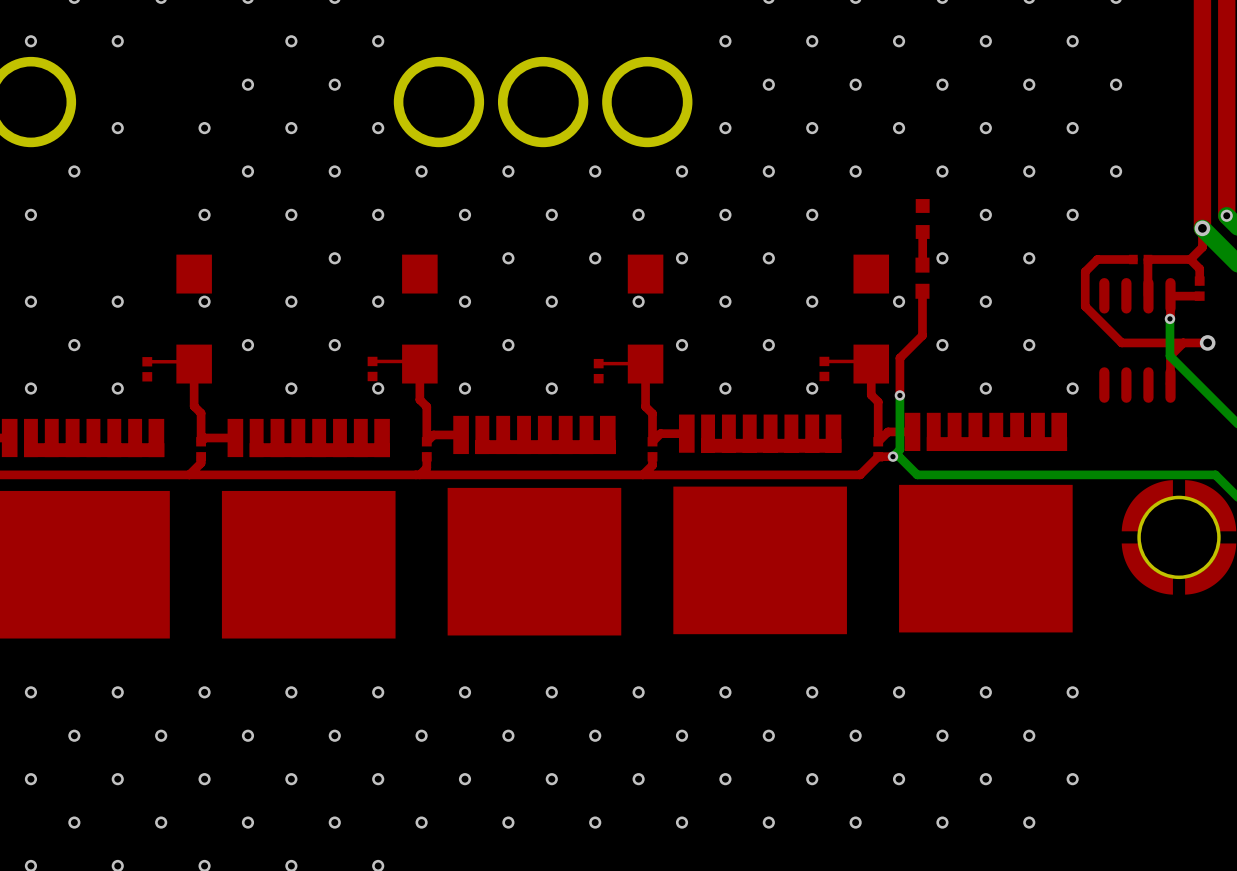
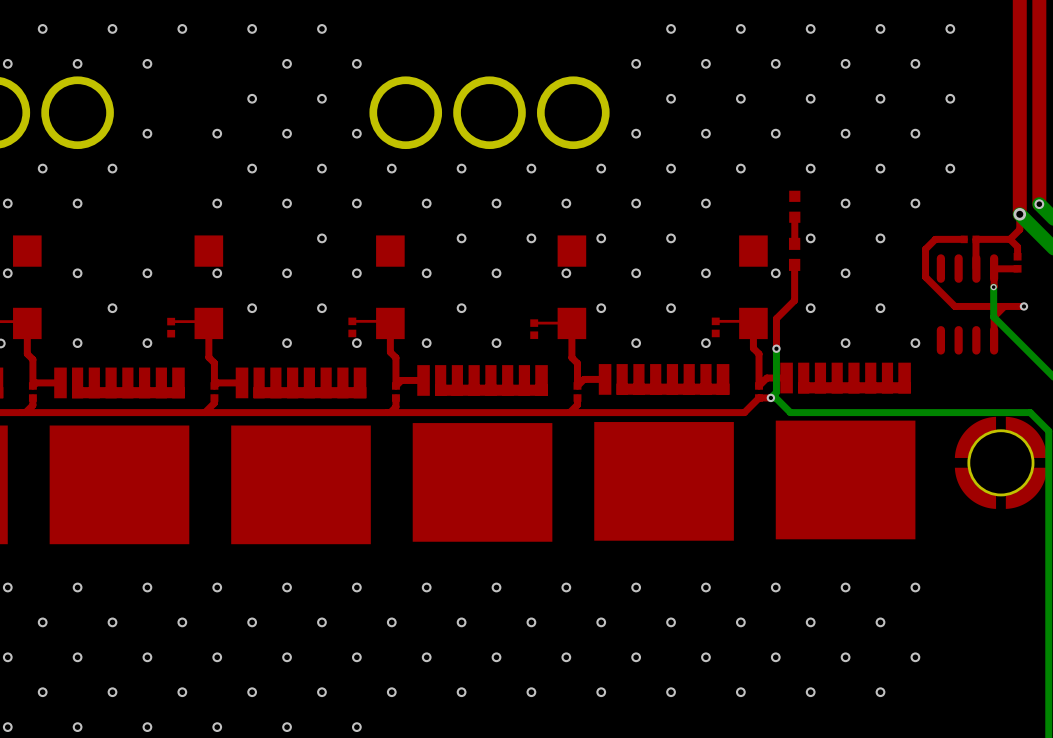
via position: (1169, 318) -> (1023, 306)
via: none -> (993, 287)
via: (1207, 342) -> none

